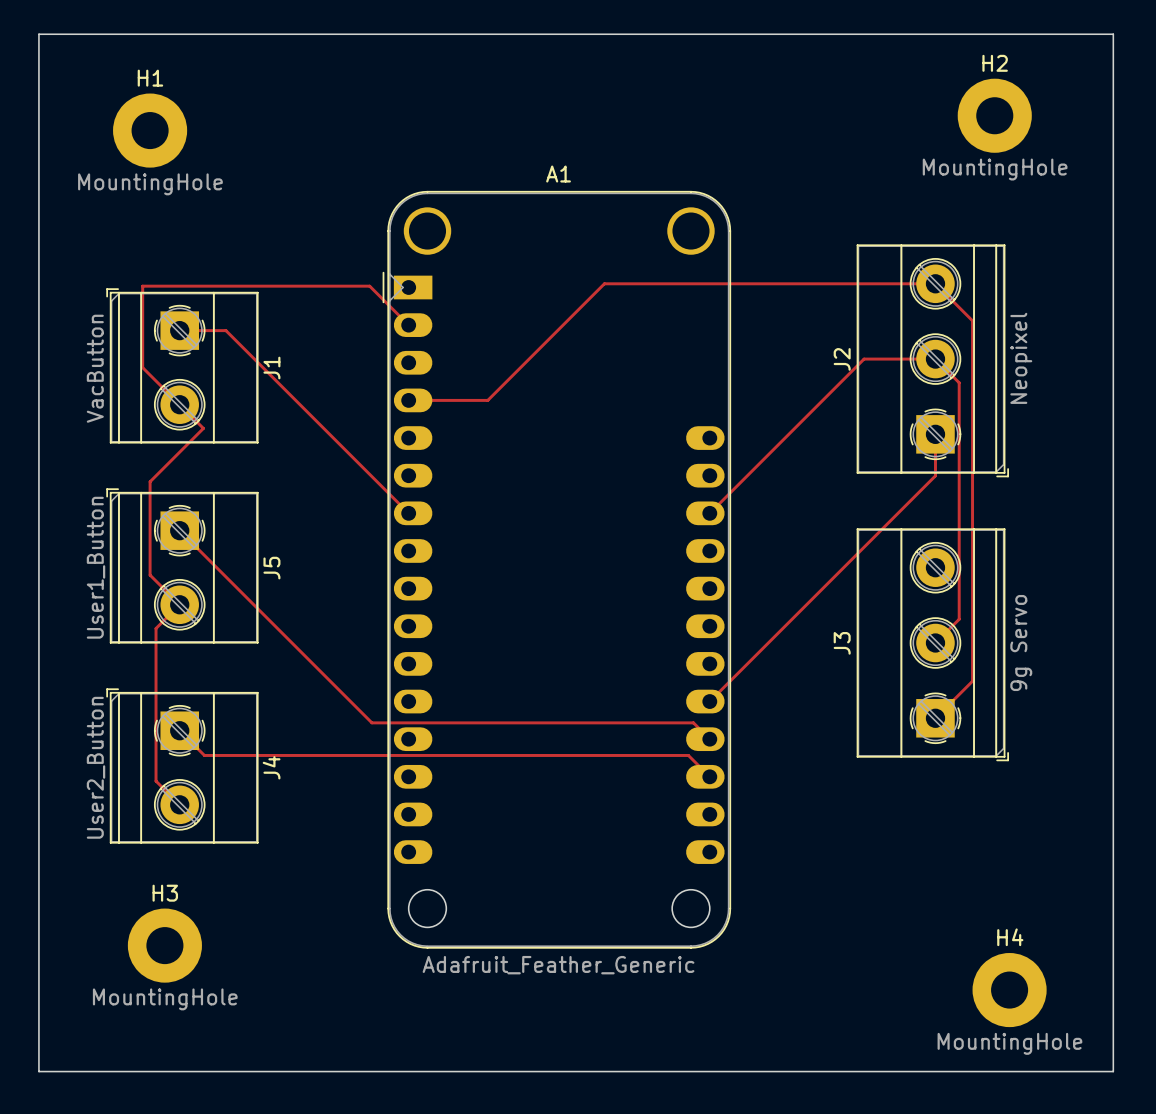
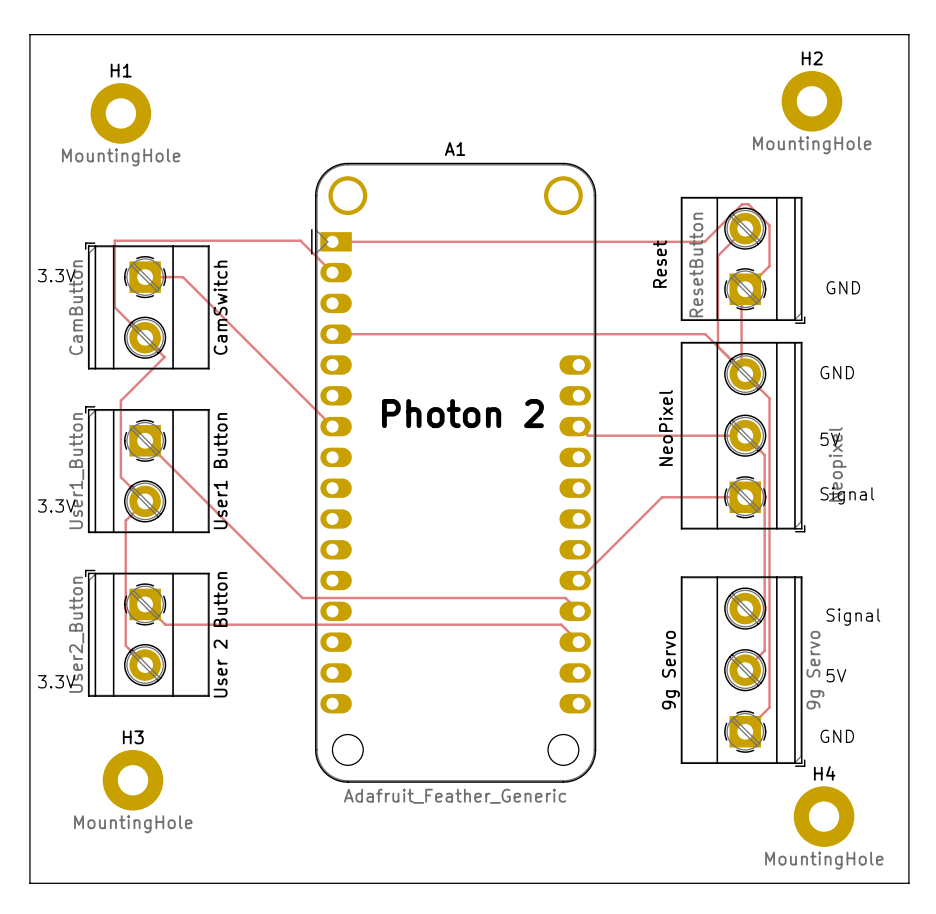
track: none -> (745, 228) (717, 255) (717, 346)
track: none -> (332, 241) (704, 241) (742, 204) (748, 204) (769, 225) (769, 266) (746, 289)
Reset: none -> ResetButton (743, 260)
text: none -> 3.3V (56, 275)
track: none -> (741, 283) (741, 370)
text: none -> GND (843, 287)
J2: Neopixel (932, 360) -> none
J1 value: VacButton (95, 368) -> CamButton (76, 307)
J1 name: J1 (271, 368) -> CamSwitch (220, 307)
track: (487, 400) (604, 283) (935, 283) (972, 320) (972, 681) (935, 718) -> (397, 334) (705, 334) (769, 398) (769, 707) (745, 731)
track: (935, 434) (935, 475) (811, 599) -> (745, 497) (662, 497)
text: none -> GND (837, 372)
text: none -> Photon 2 (462, 413)
track: (709, 513) (864, 359) (935, 359) (959, 382) (959, 619) (935, 643) -> (578, 426) (587, 435) (745, 435) (764, 455) (764, 650) (745, 670)
NeoPixel: none -> Neopixel (743, 437)
text: none -> 5V (830, 439)
J5 name: J5 (271, 568) -> User1 Button (220, 471)
text: none -> Signal (847, 495)
text: none -> 3.3V (56, 505)
J3: 9g Servo (932, 644) -> none
text: none -> Signal (853, 617)
J4 name: J4 (271, 767) -> User 2 Button (220, 634)
9g Servo: none -> 9g Servo (743, 671)
text: none -> 5V (836, 675)
text: none -> 3.3V (56, 681)
text: none -> GND (837, 736)

